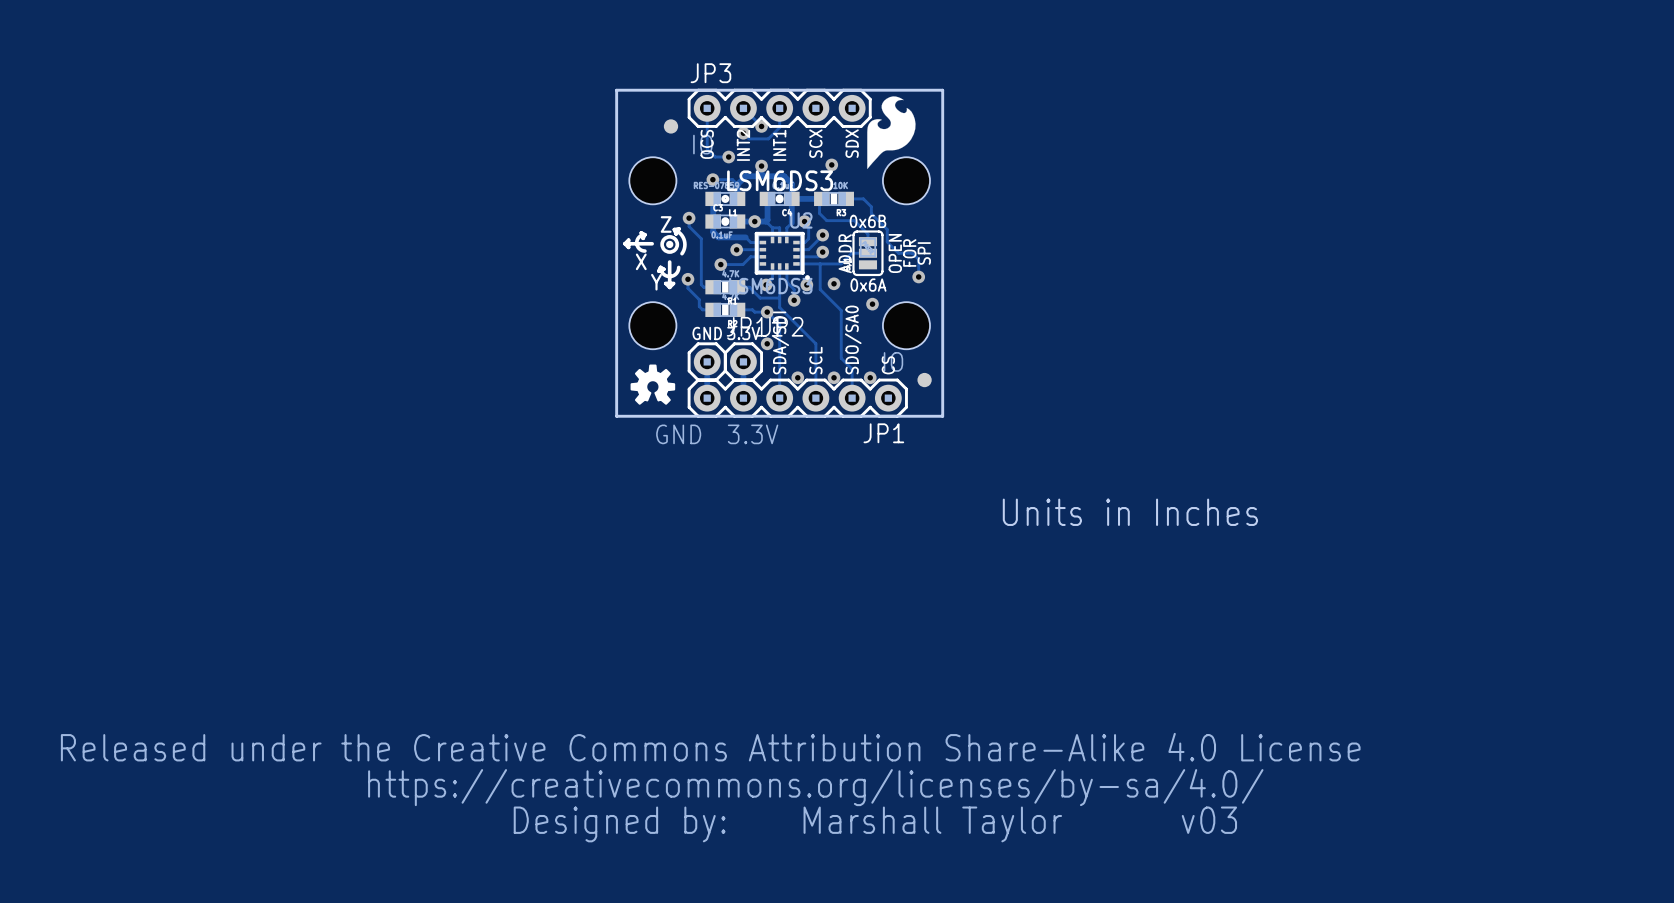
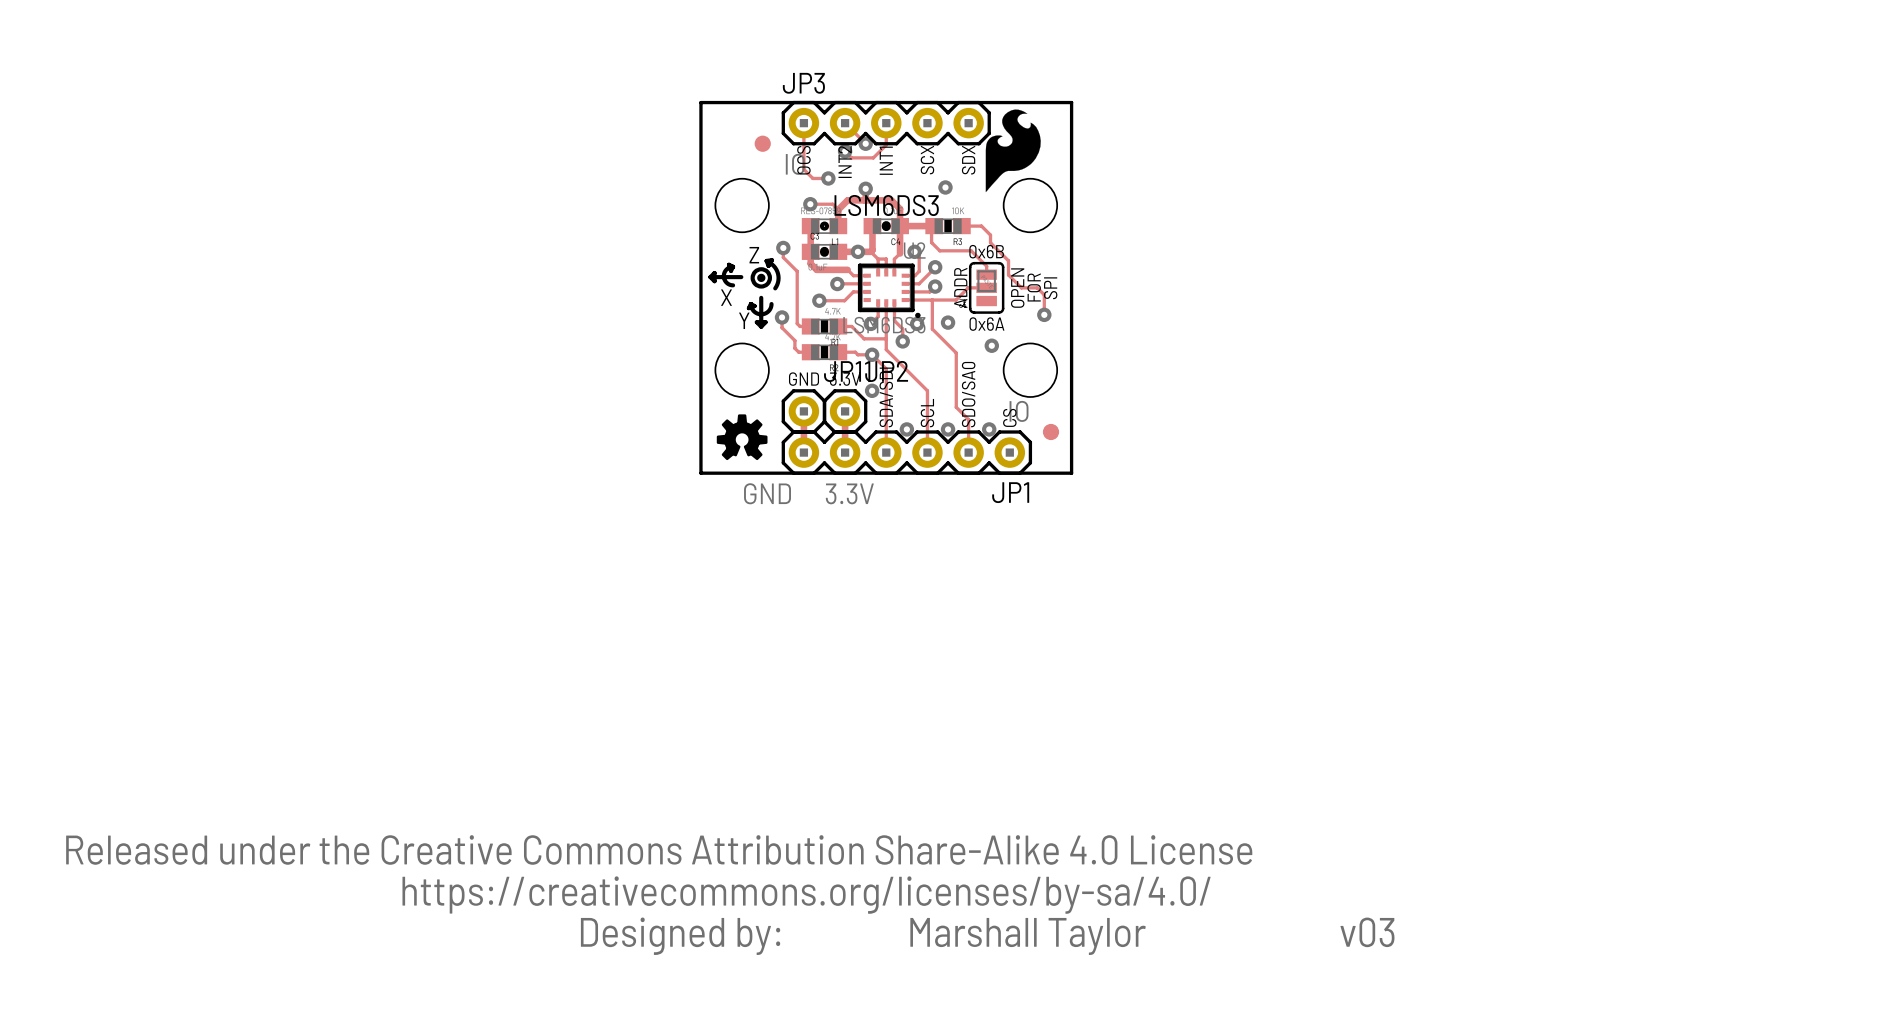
text: Units in Inches (1130, 512) -> none

